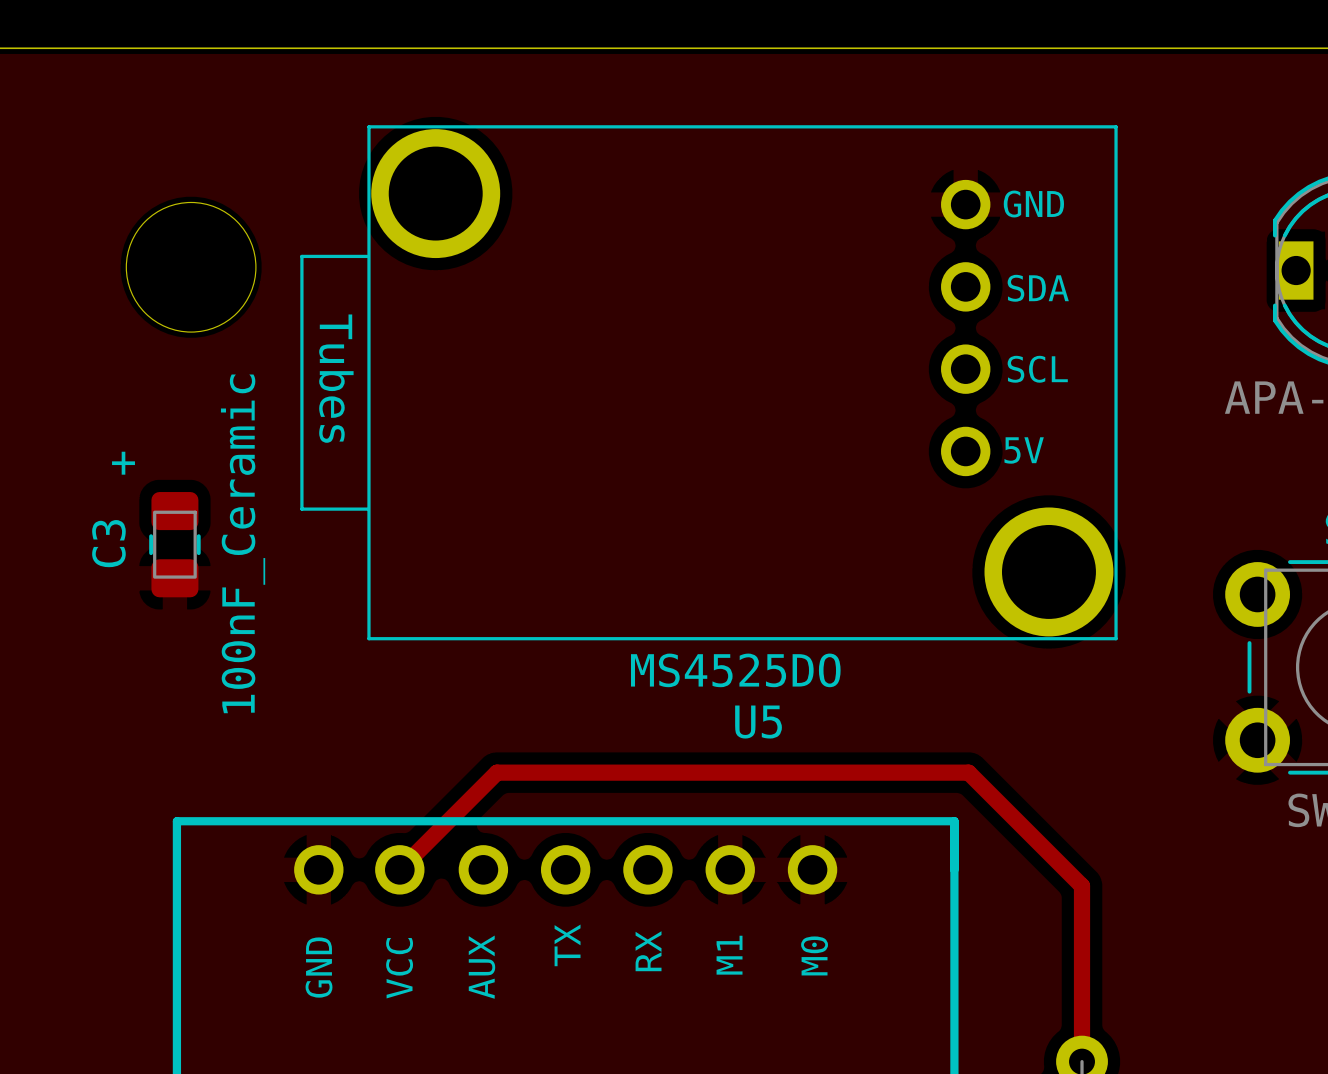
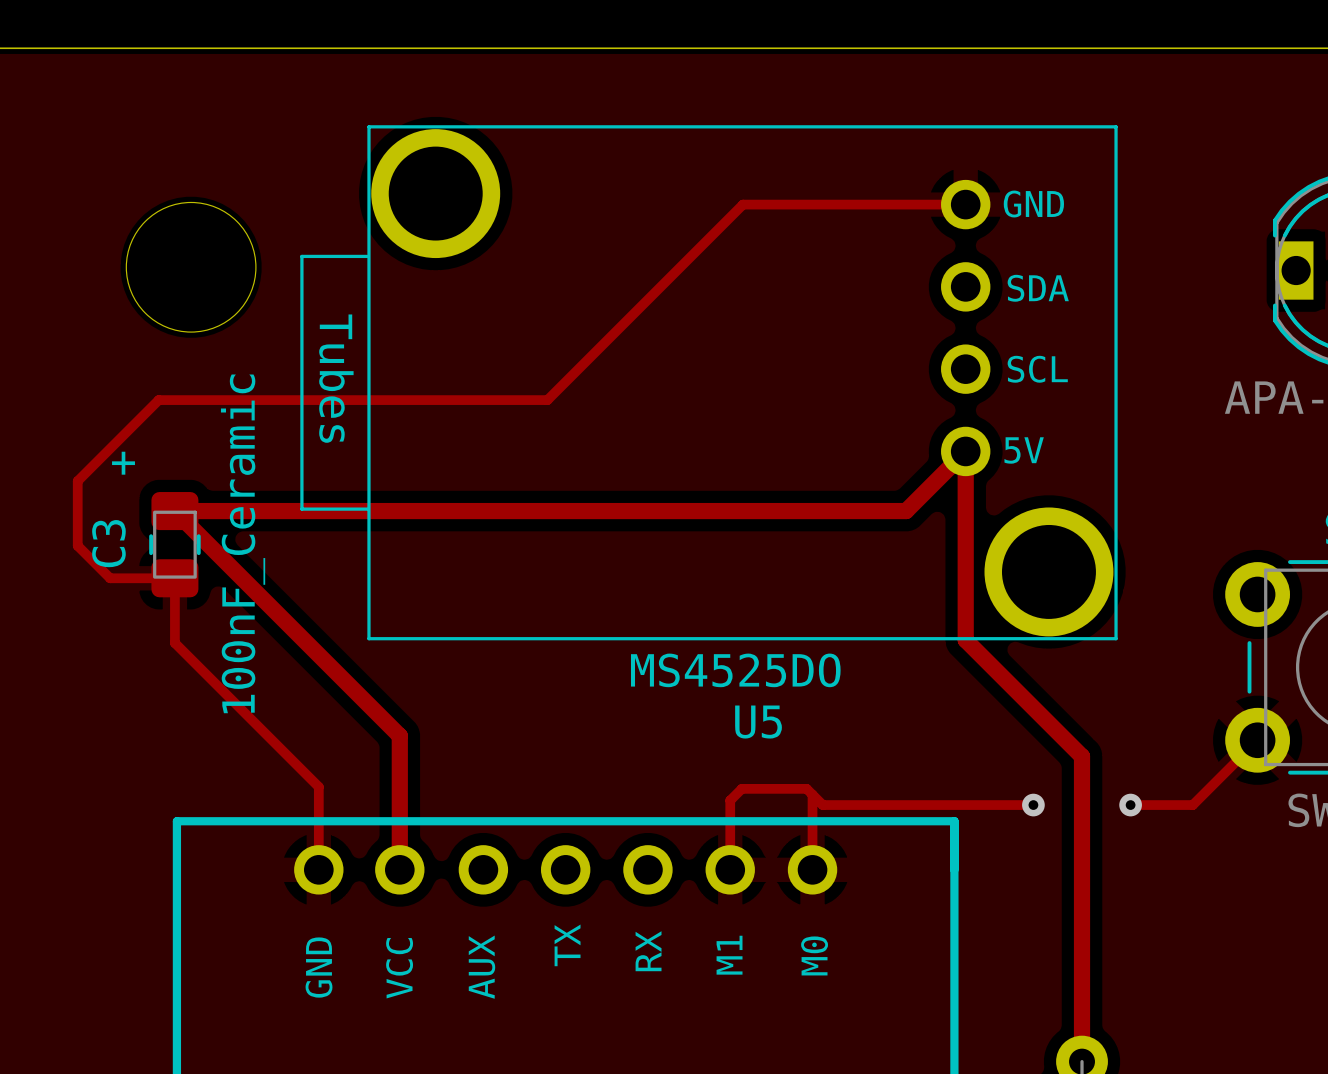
track: none -> (965, 204) (742, 204) (547, 400) (158, 400) (77, 481) (77, 545) (110, 578) (174, 578) (174, 643) (318, 786) (318, 869)
track: none -> (1257, 740) (1192, 805) (1130, 805)
track: none -> (812, 794) (812, 869)
track: none -> (1033, 805) (822, 805) (806, 788) (741, 788) (730, 800) (730, 869)
via: none -> (1033, 805)
via: none -> (1130, 805)
track: (399, 869) (496, 772) (968, 772) (1082, 886) -> (399, 869) (399, 735) (174, 511) (906, 511) (965, 451) (965, 640) (1082, 756) (1082, 886)

